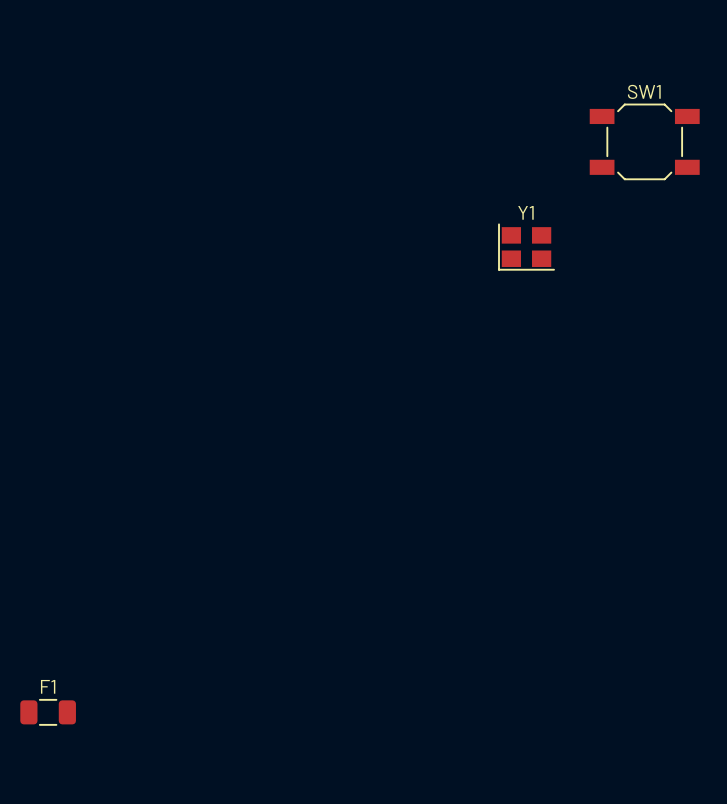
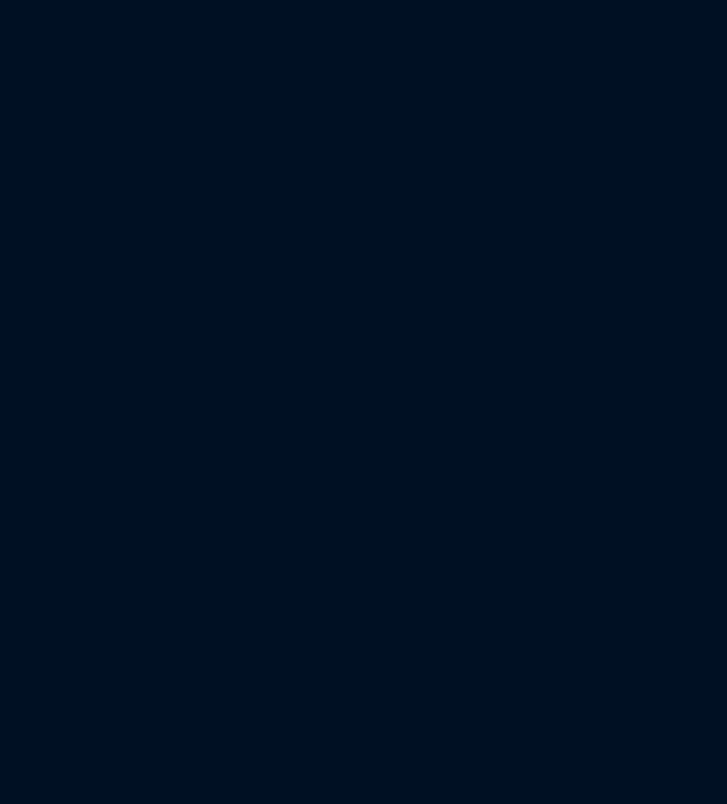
SW1: (644, 141) -> none
Y1: (526, 247) -> none
F1: (48, 712) -> none

